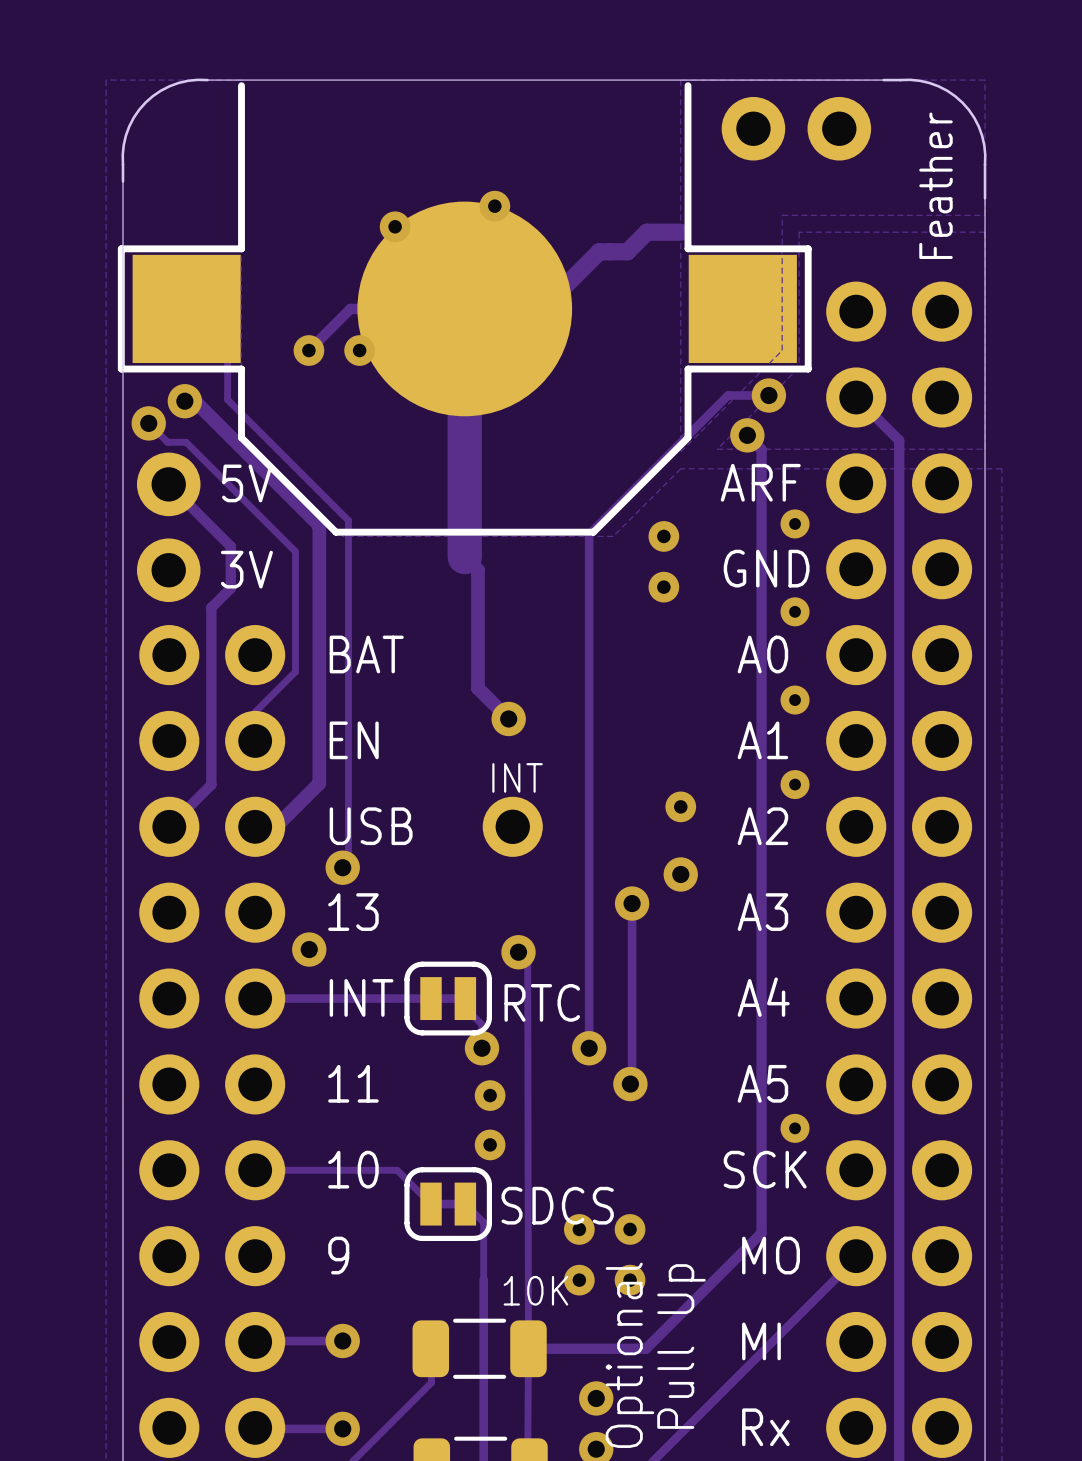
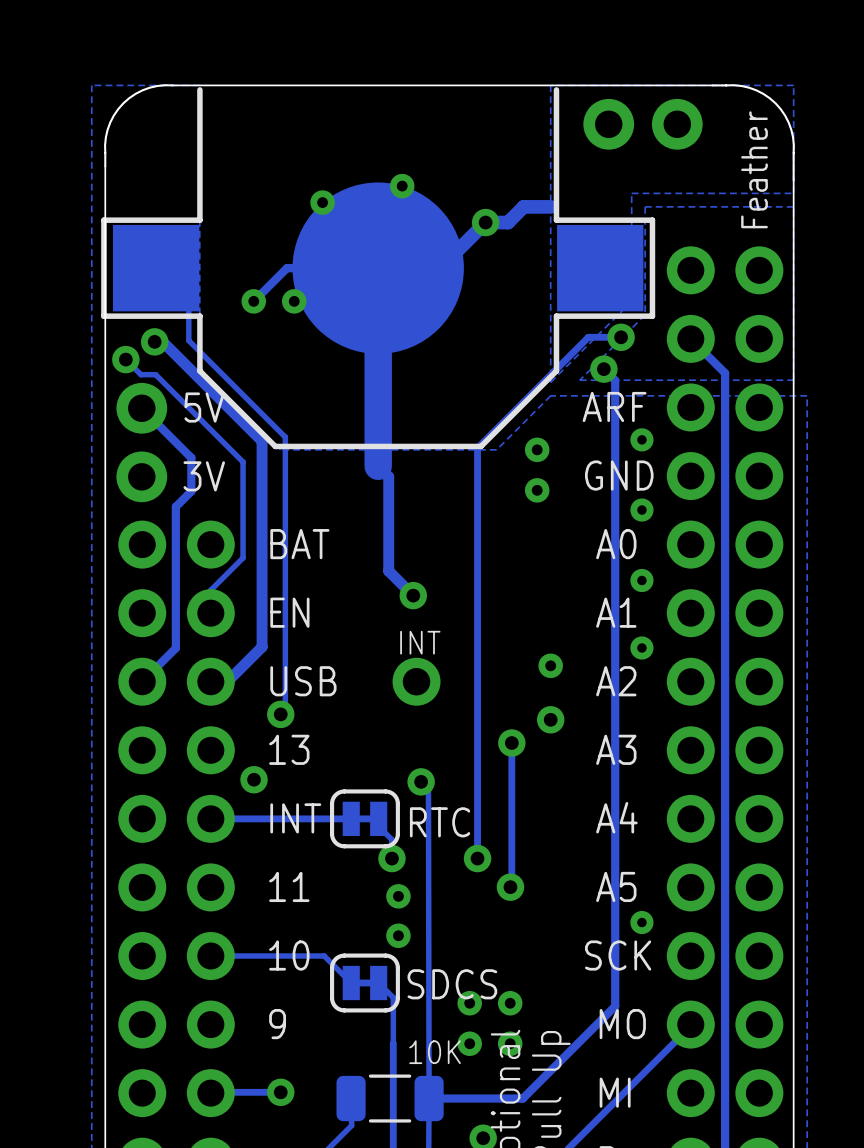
via: none -> (485, 222)

